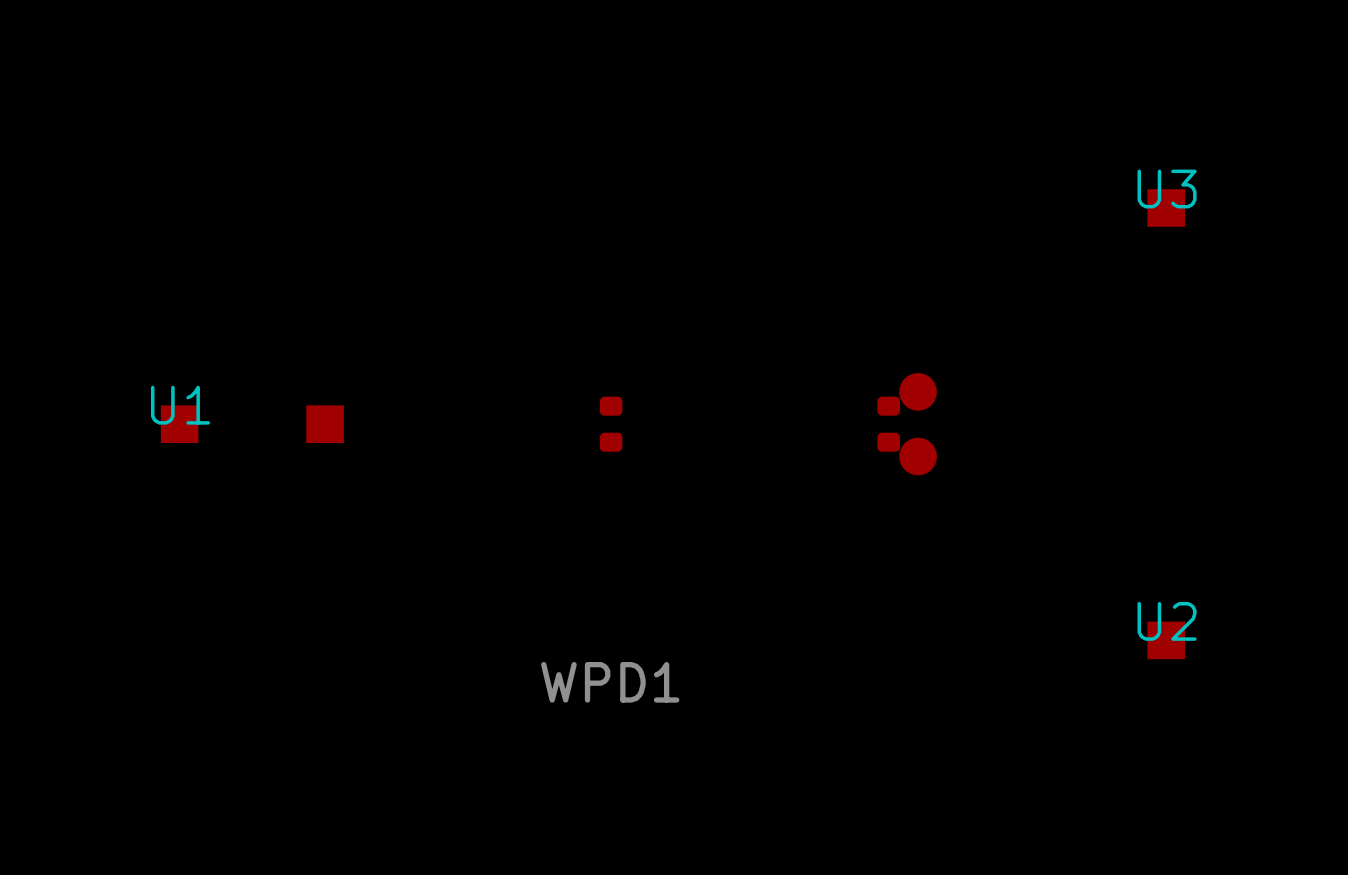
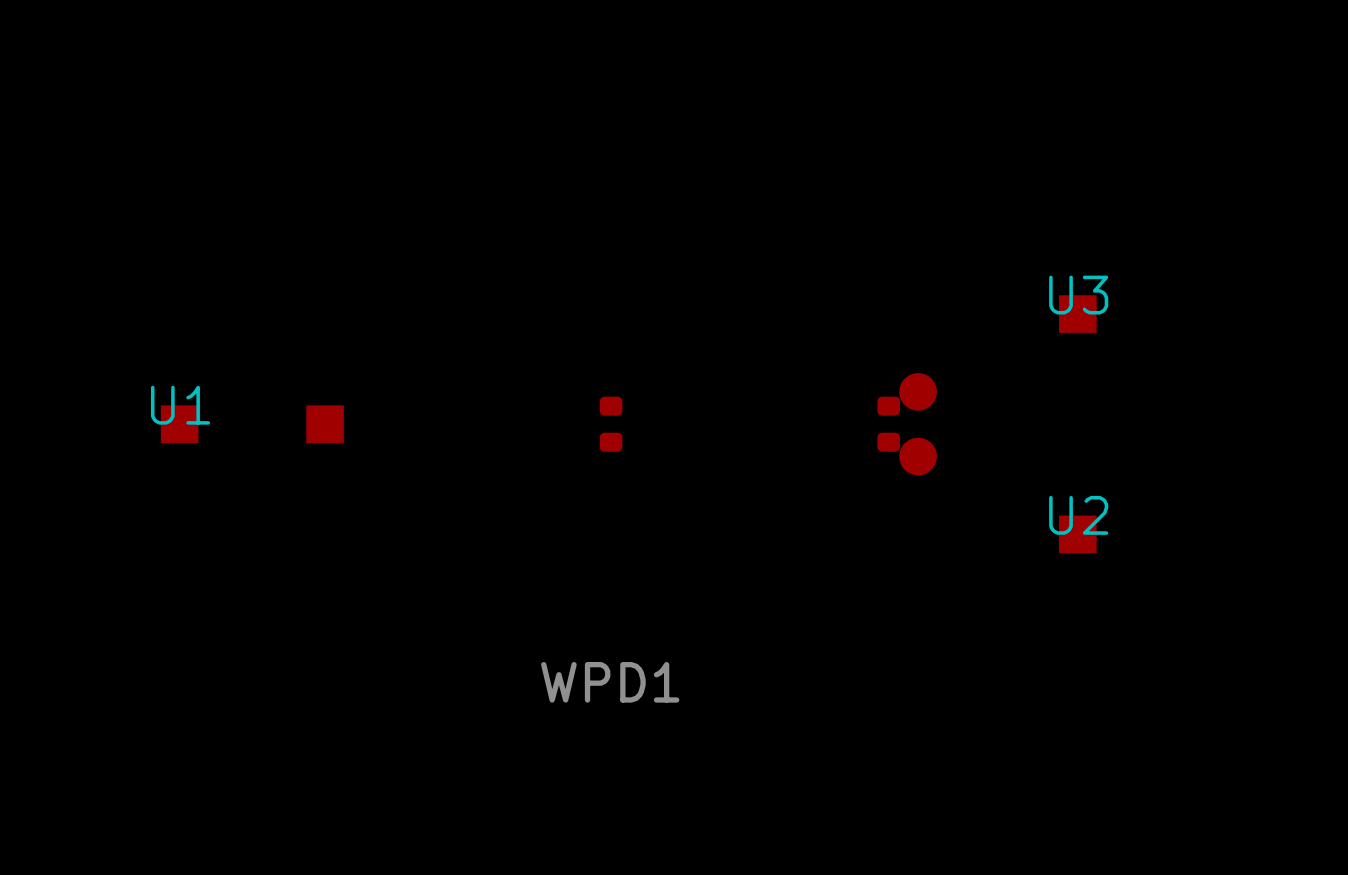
U3 position: (1166, 208) -> (1077, 314)
U2 position: (1166, 640) -> (1077, 534)

